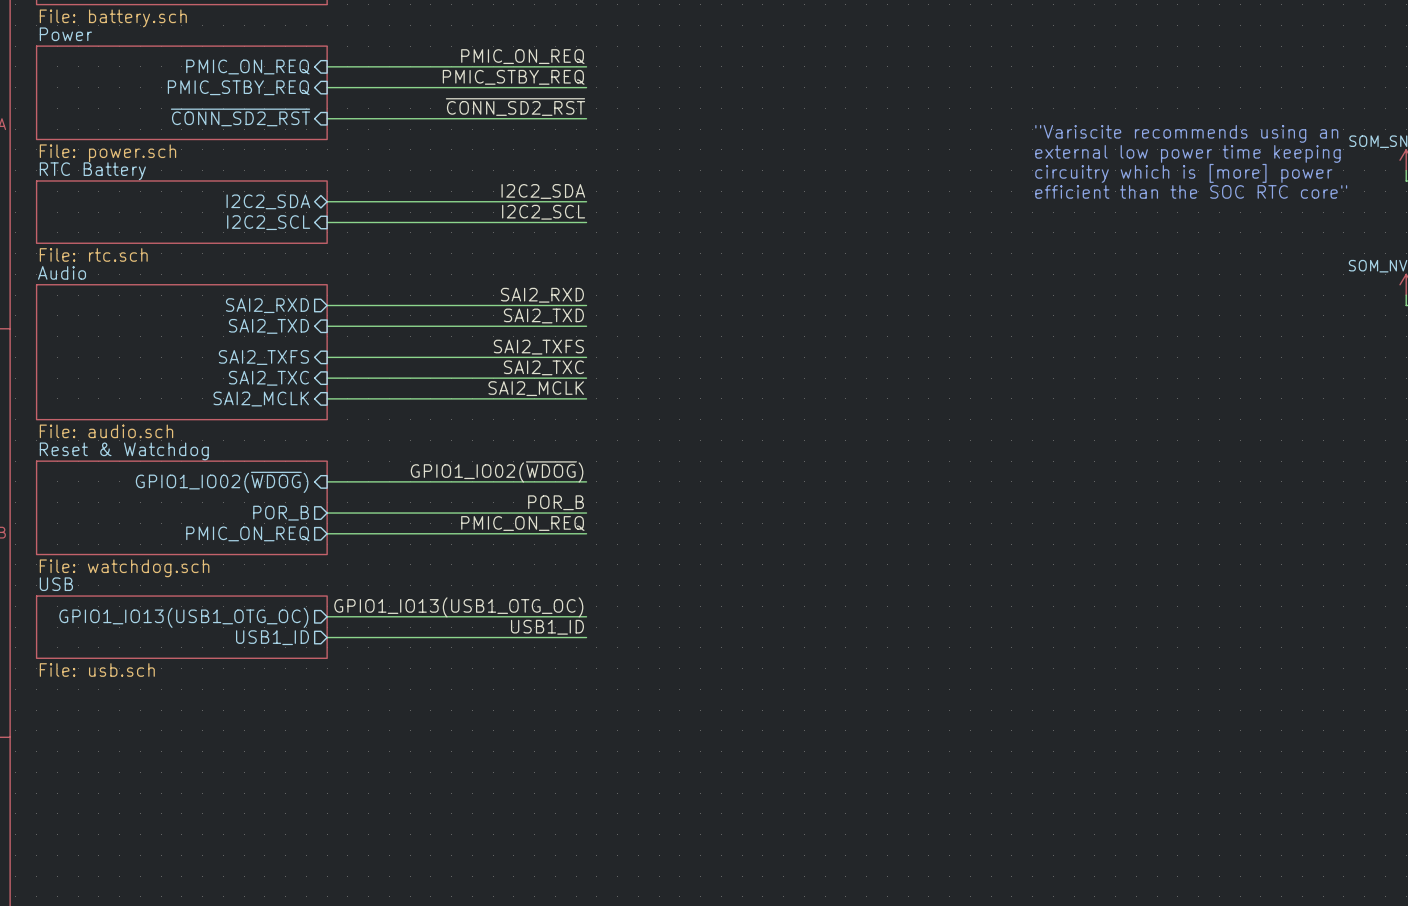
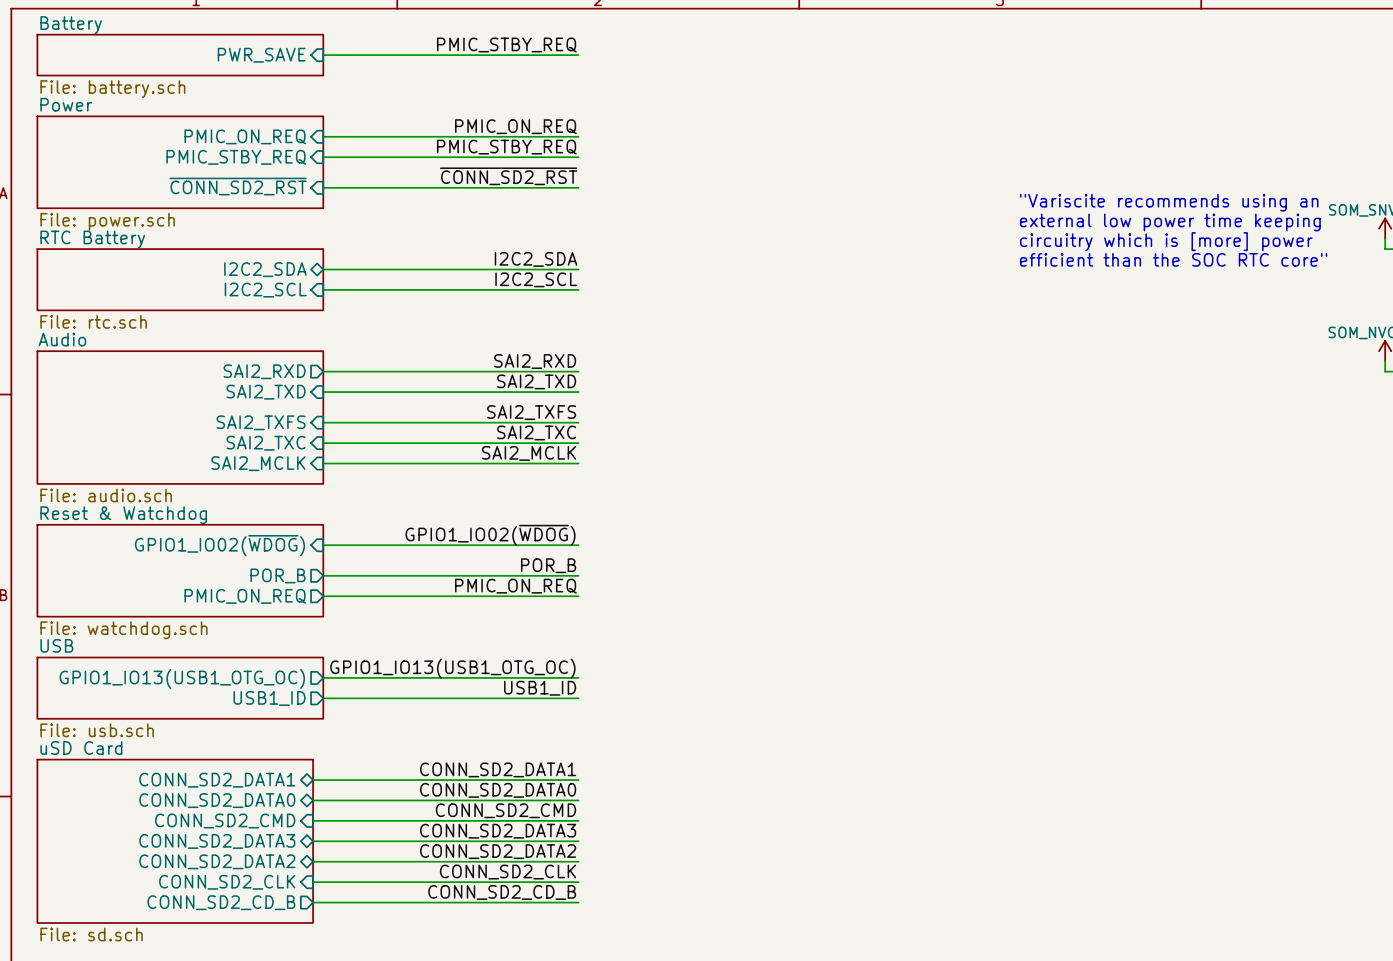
label: none -> CONN_SD2_DATA1 (498, 769)
sheet pin: none -> CONN_SD2_DATA1 (217, 780)
wire: none -> (313, 780) (578, 780)
label: none -> CONN_SD2_DATA0 (498, 790)
sheet pin: none -> CONN_SD2_DATA0 (217, 800)
wire: none -> (313, 800) (578, 800)
label: none -> CONN_SD2_CMD (505, 810)
sheet pin: none -> CONN_SD2_CMD (225, 821)
wire: none -> (313, 820) (578, 820)
label: none -> CONN_SD2_DATA3 (498, 831)
sheet uSD Card: none -> File: sd.sch (175, 841)
sheet pin: none -> CONN_SD2_DATA3 (217, 841)
wire: none -> (313, 841) (578, 841)
label: none -> CONN_SD2_DATA2 (498, 851)
sheet pin: none -> CONN_SD2_DATA2 (217, 861)
wire: none -> (313, 861) (578, 861)
label: none -> CONN_SD2_CLK (508, 872)
sheet pin: none -> CONN_SD2_CLK (227, 882)
wire: none -> (313, 882) (578, 882)
label: none -> CONN_SD2_CD_B (502, 892)
sheet pin: none -> CONN_SD2_CD_B (221, 902)
wire: none -> (313, 902) (578, 902)

